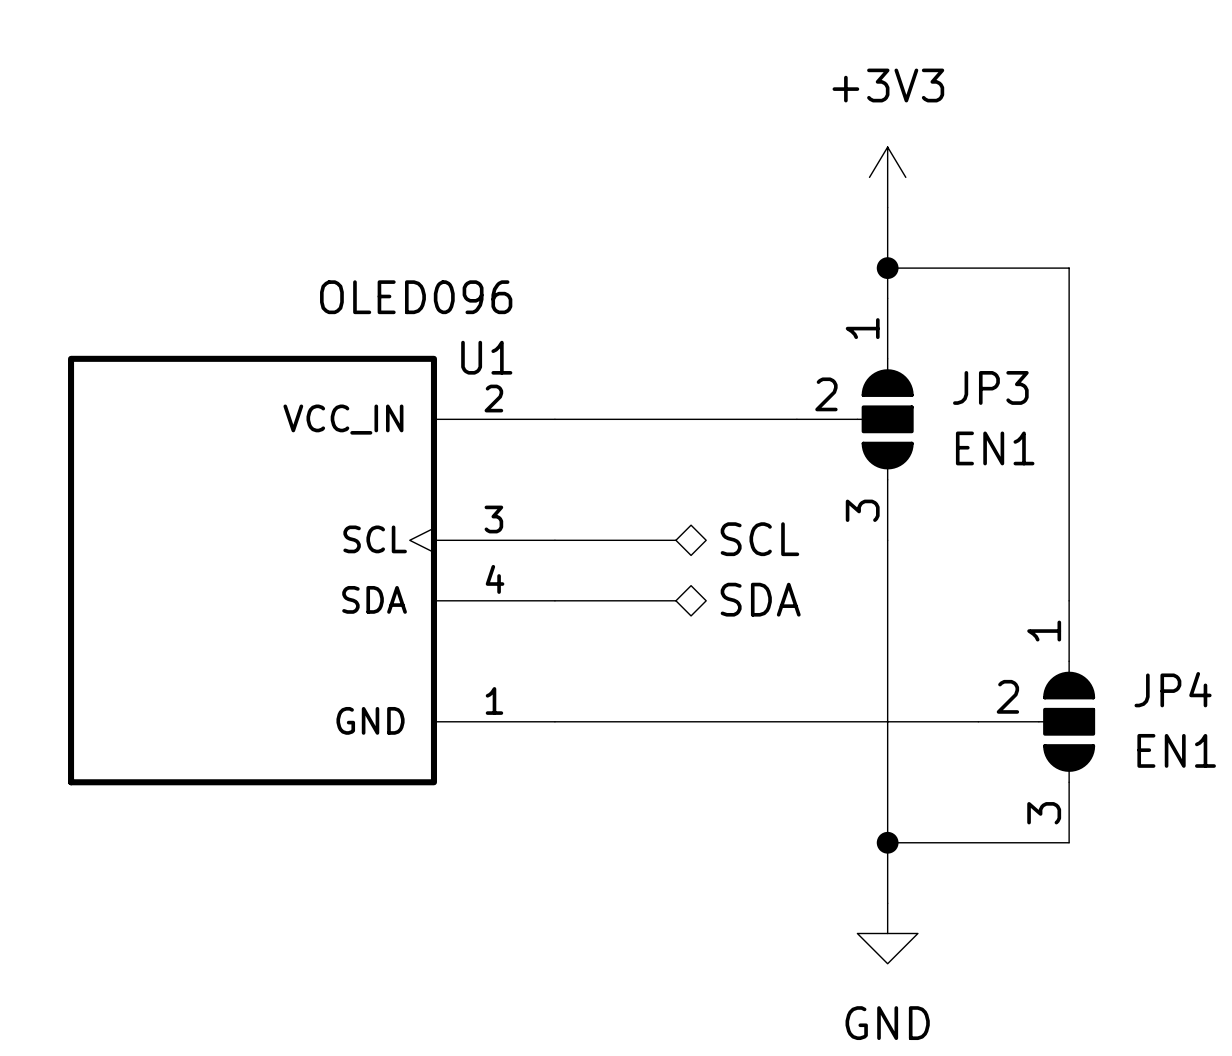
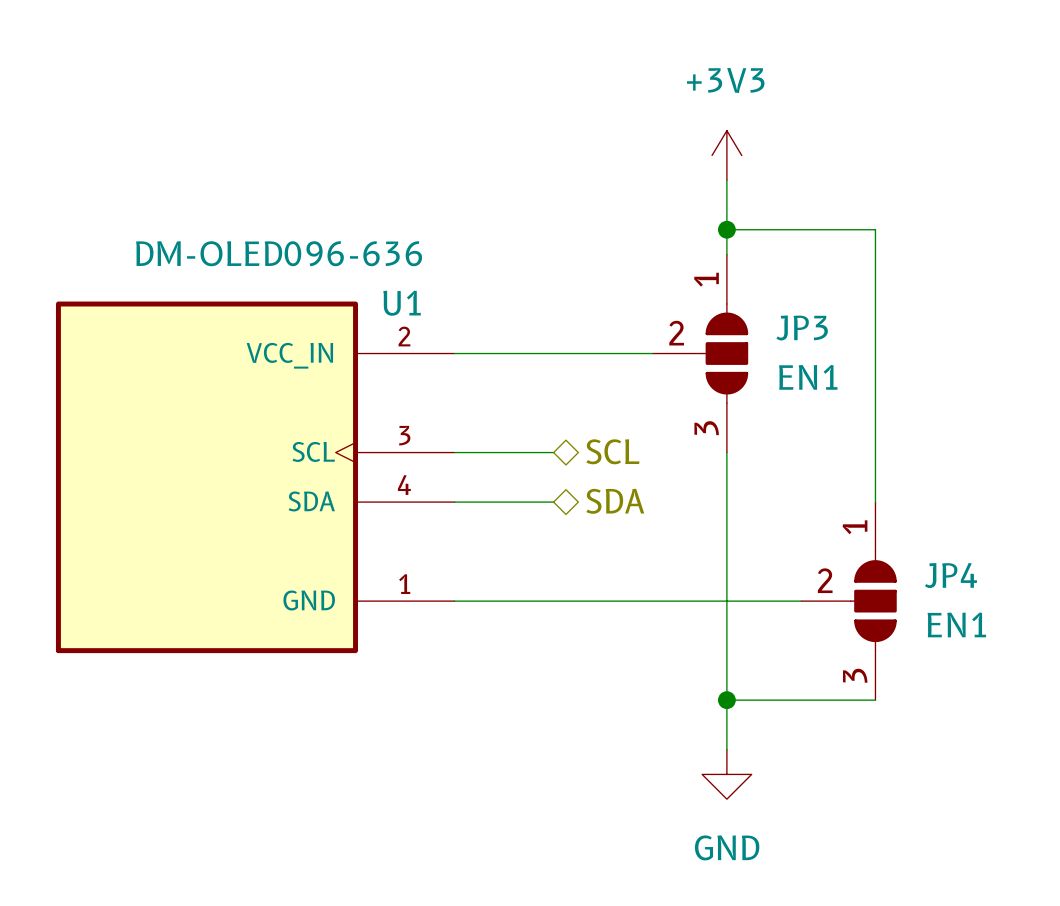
U1 value: OLED096 (416, 297) -> DM-OLED096-636 (279, 253)

